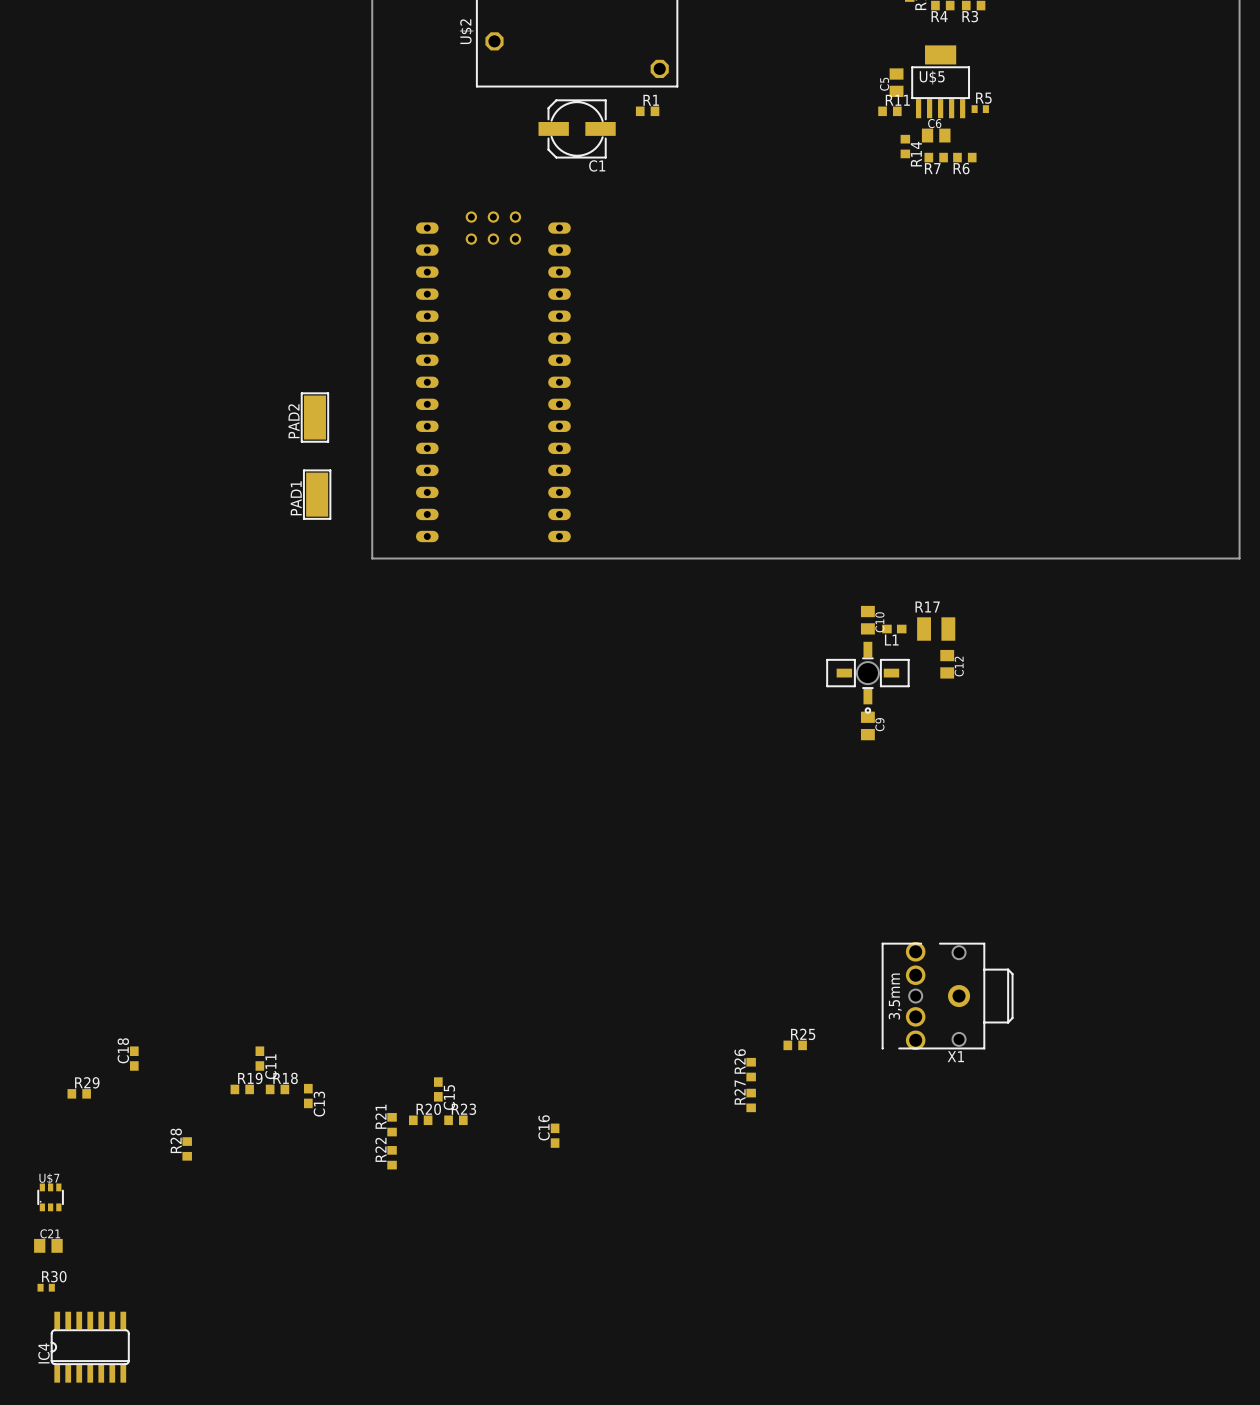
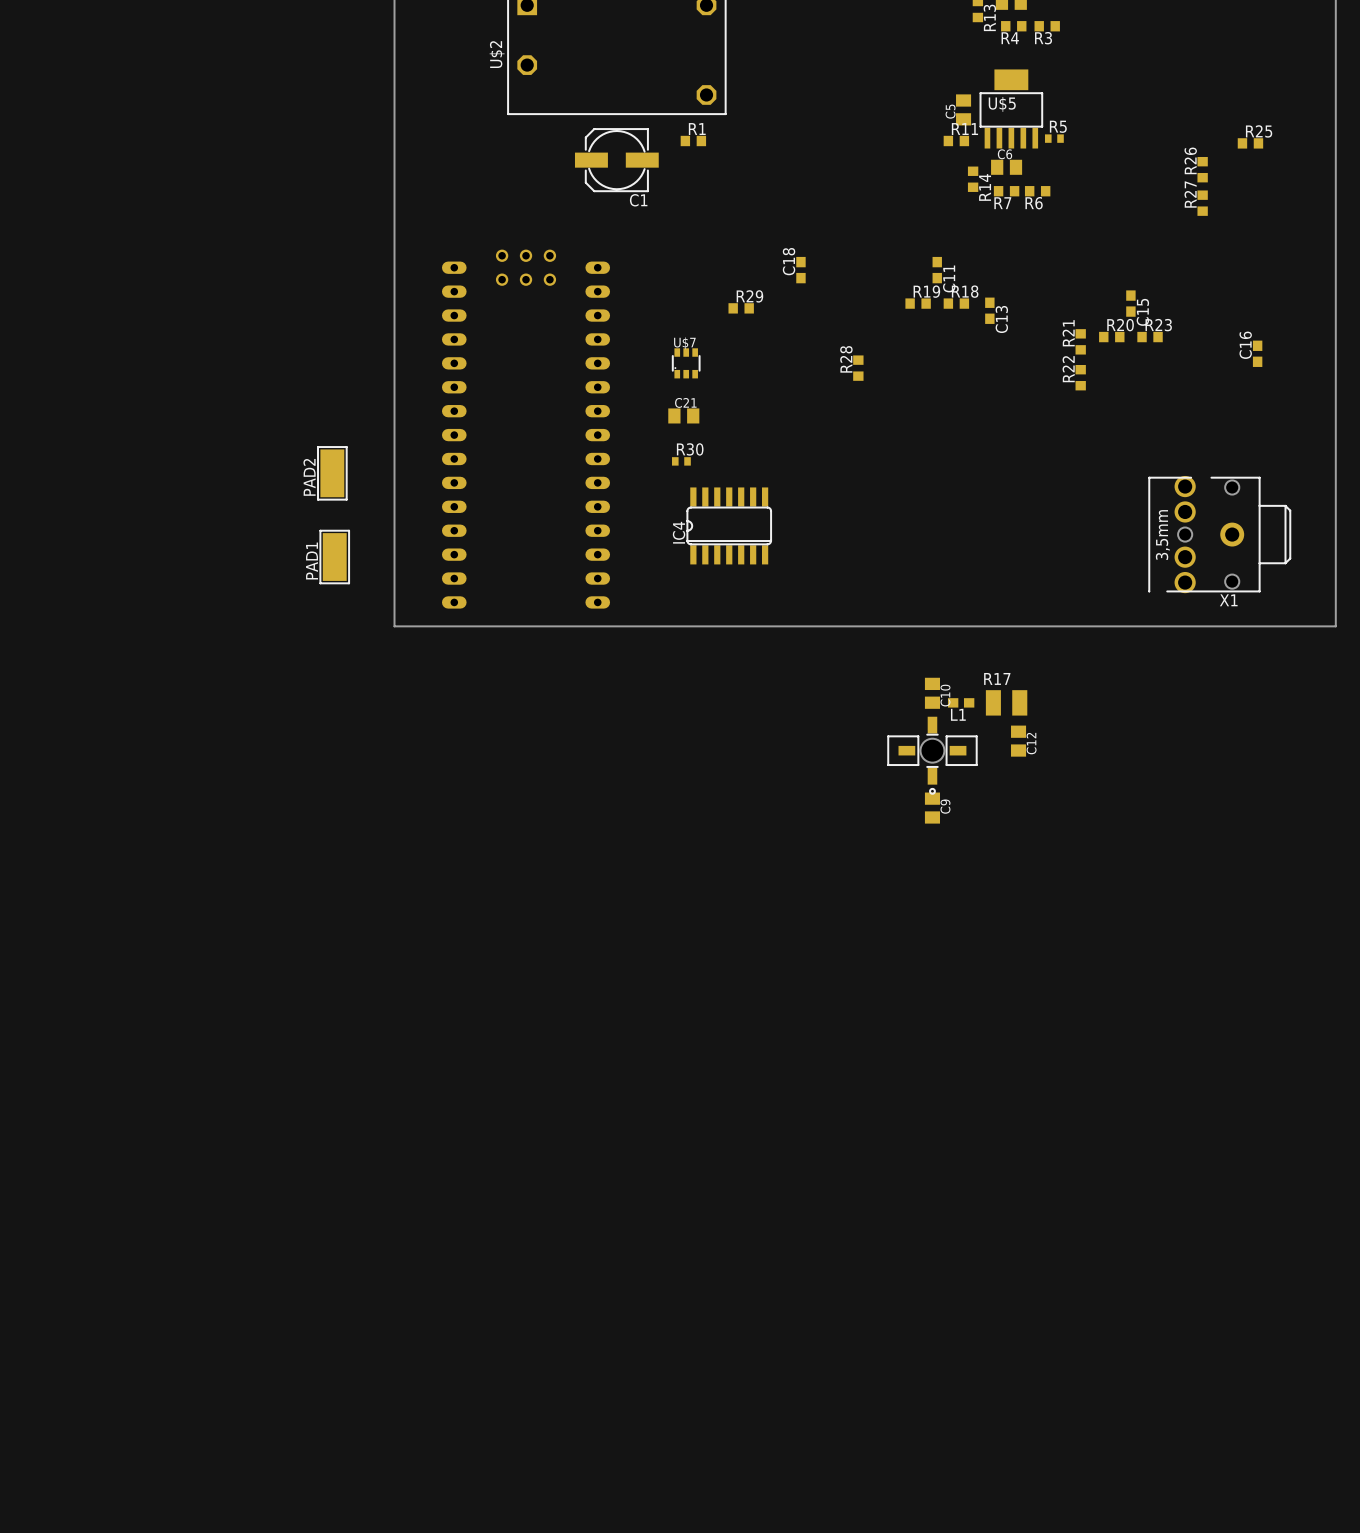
X1 position: (947, 996) -> (1219, 534)
R25 position: (795, 1045) -> (1250, 143)
C18 position: (134, 1058) -> (800, 270)
C11 position: (259, 1058) -> (937, 270)
R26 position: (751, 1069) -> (1202, 169)
R19 position: (242, 1089) -> (918, 303)
R18 position: (277, 1089) -> (956, 303)
C15 position: (438, 1089) -> (1130, 303)
R29 position: (79, 1093) -> (741, 308)
C13 position: (308, 1096) -> (989, 310)
R27 position: (751, 1100) -> (1202, 203)
R20 position: (420, 1120) -> (1111, 337)
R23 position: (455, 1120) -> (1150, 337)
R21 position: (392, 1124) -> (1080, 341)
C16 position: (555, 1135) -> (1257, 353)
R28 position: (187, 1148) -> (858, 368)
R22 position: (392, 1157) -> (1080, 377)
U$7 position: (50, 1197) -> (686, 363)
C21 position: (48, 1245) -> (683, 415)
R30 position: (46, 1287) -> (681, 461)
IC4 position: (90, 1347) -> (729, 525)

